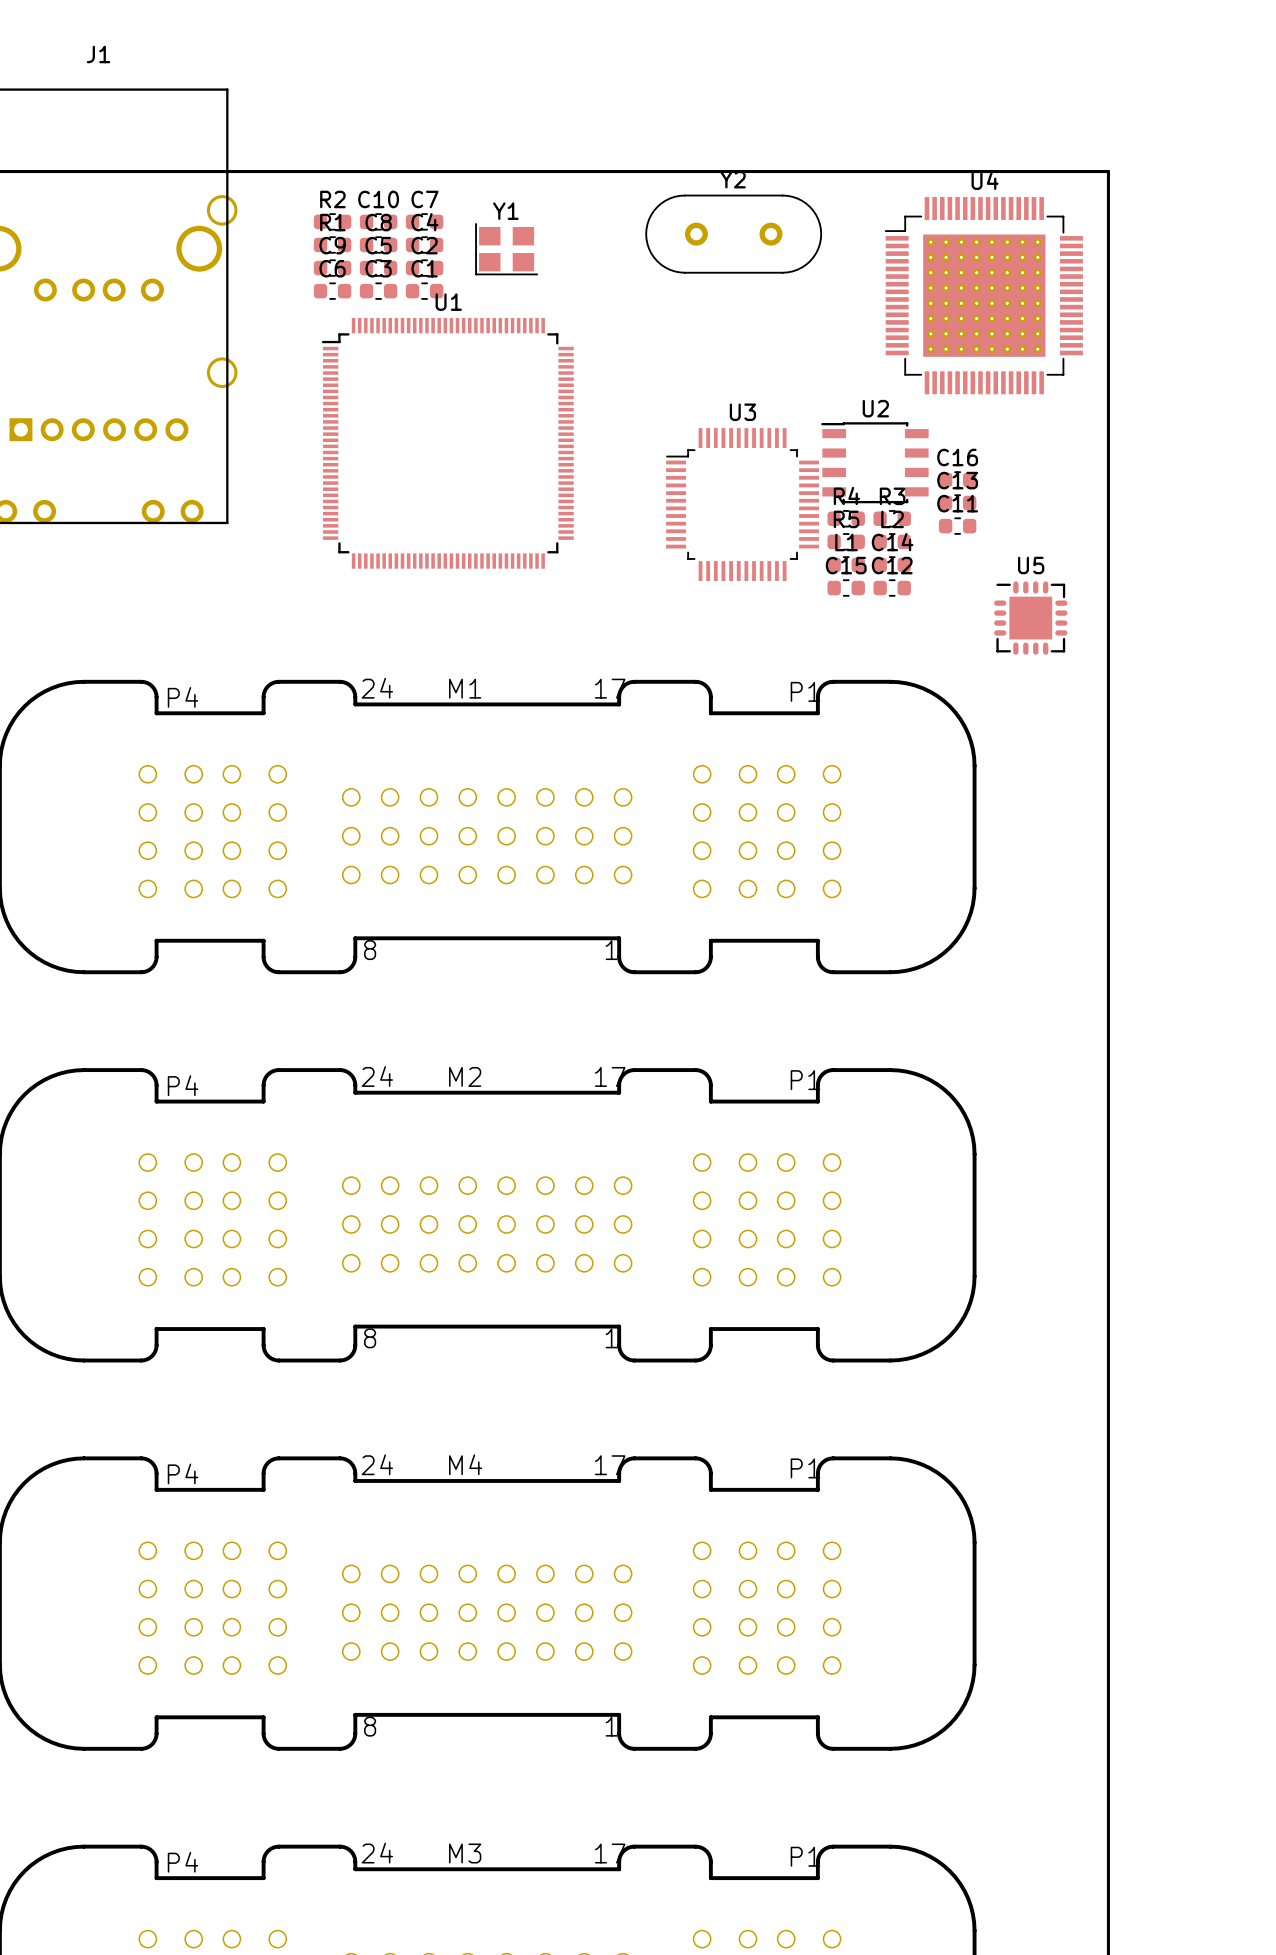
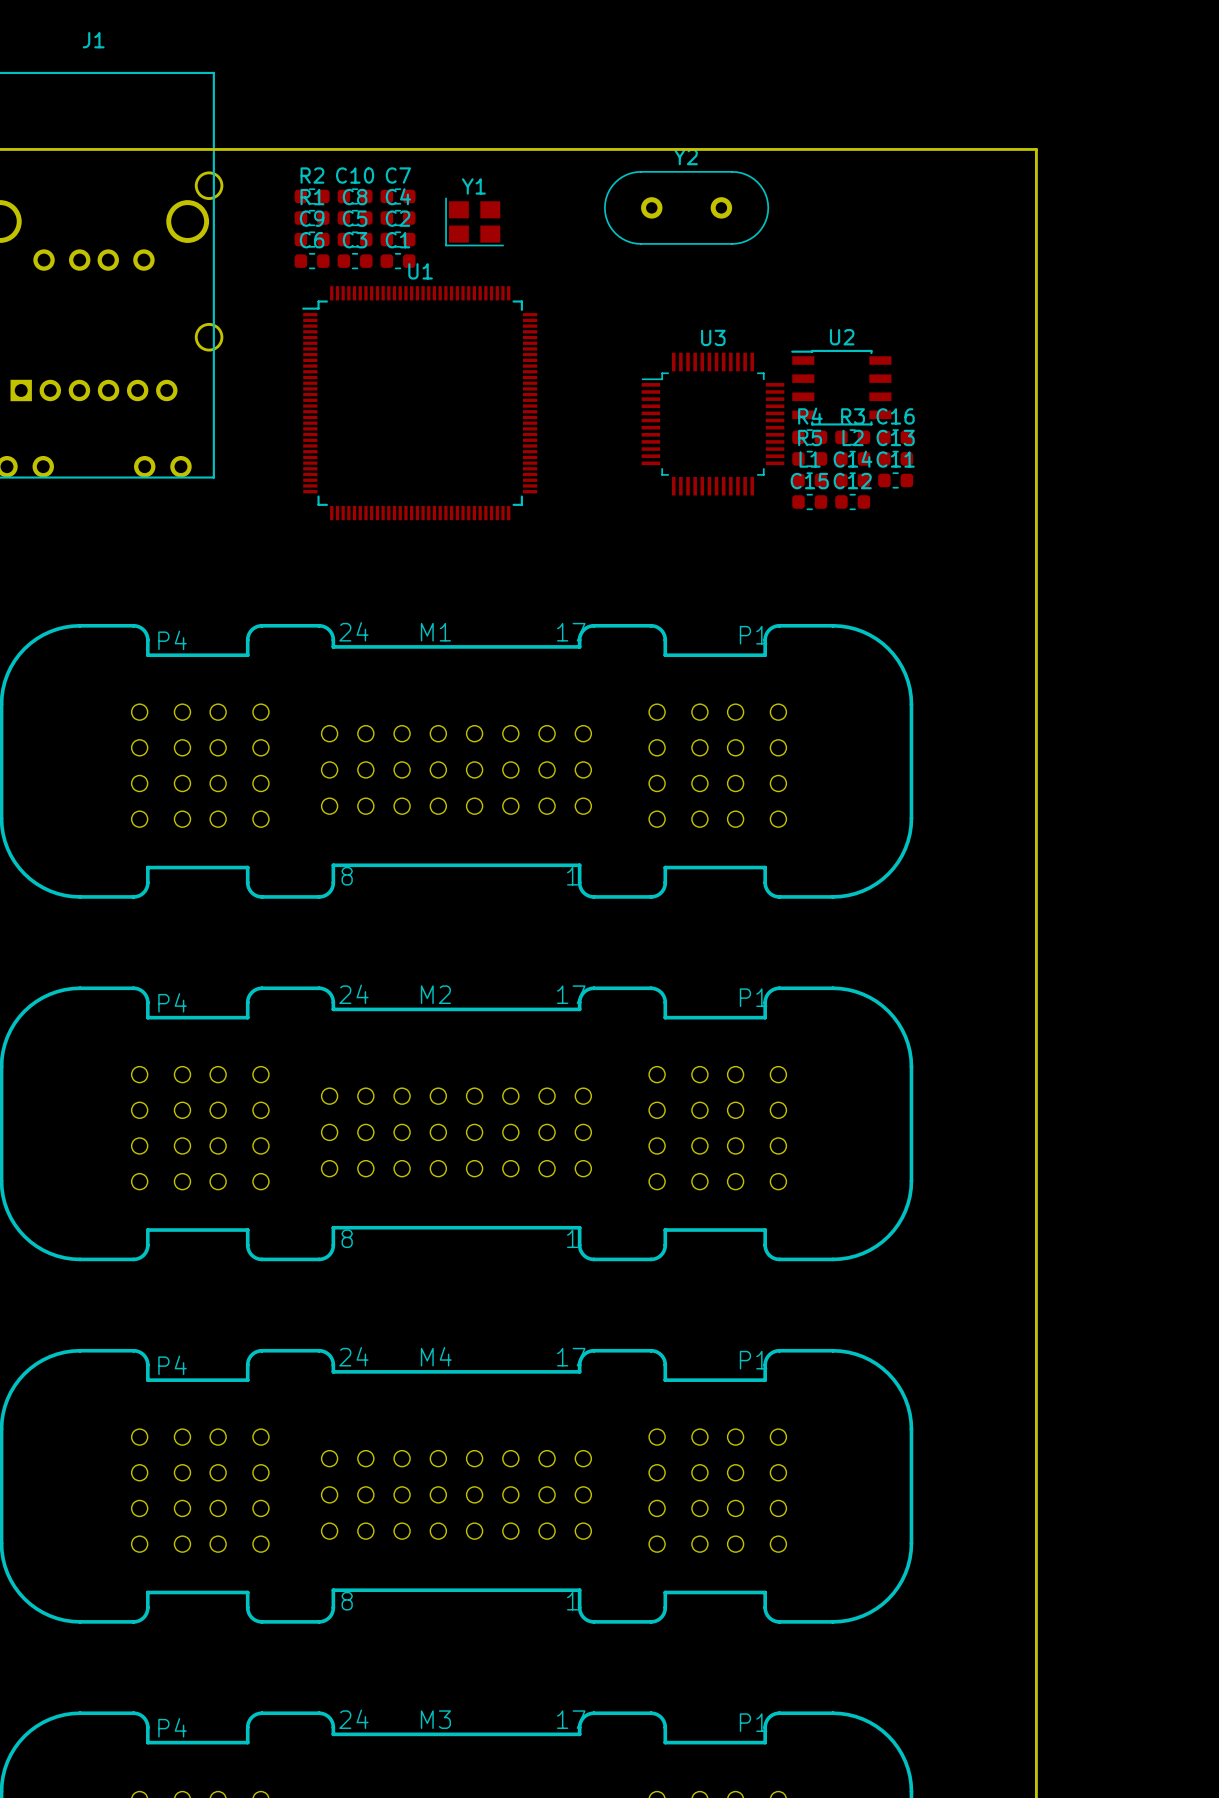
U4: (983, 295) -> none
U2 position: (874, 462) -> (841, 387)
U3 position: (742, 504) -> (712, 424)
R4 position: (846, 518) -> (809, 437)
R3 position: (892, 518) -> (852, 437)
R5 position: (846, 541) -> (809, 458)
L2 position: (892, 541) -> (852, 458)
L1 position: (846, 564) -> (809, 480)
C14 position: (892, 564) -> (852, 480)
C15 position: (846, 588) -> (809, 502)
C12 position: (892, 588) -> (852, 502)
U5: (1030, 618) -> none

